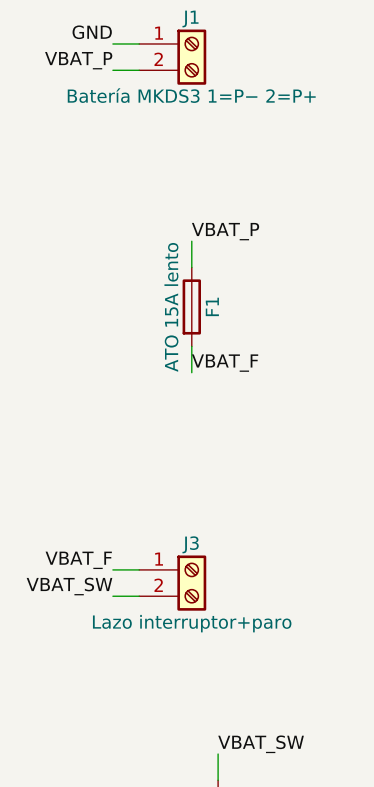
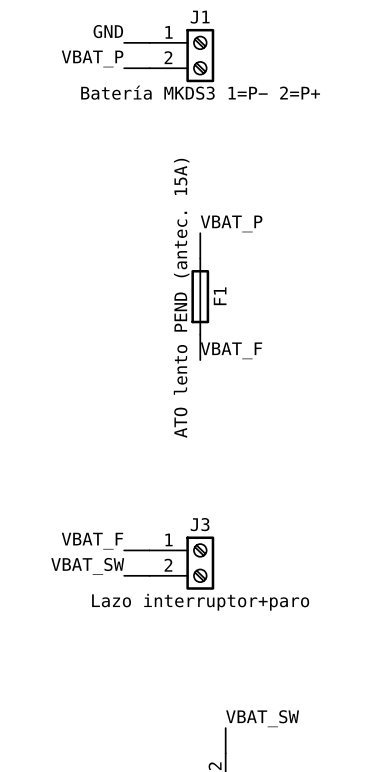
F1 value: ATO 15A lento (171, 307) -> ATO lento PEND (antec. 15A) (181, 298)

